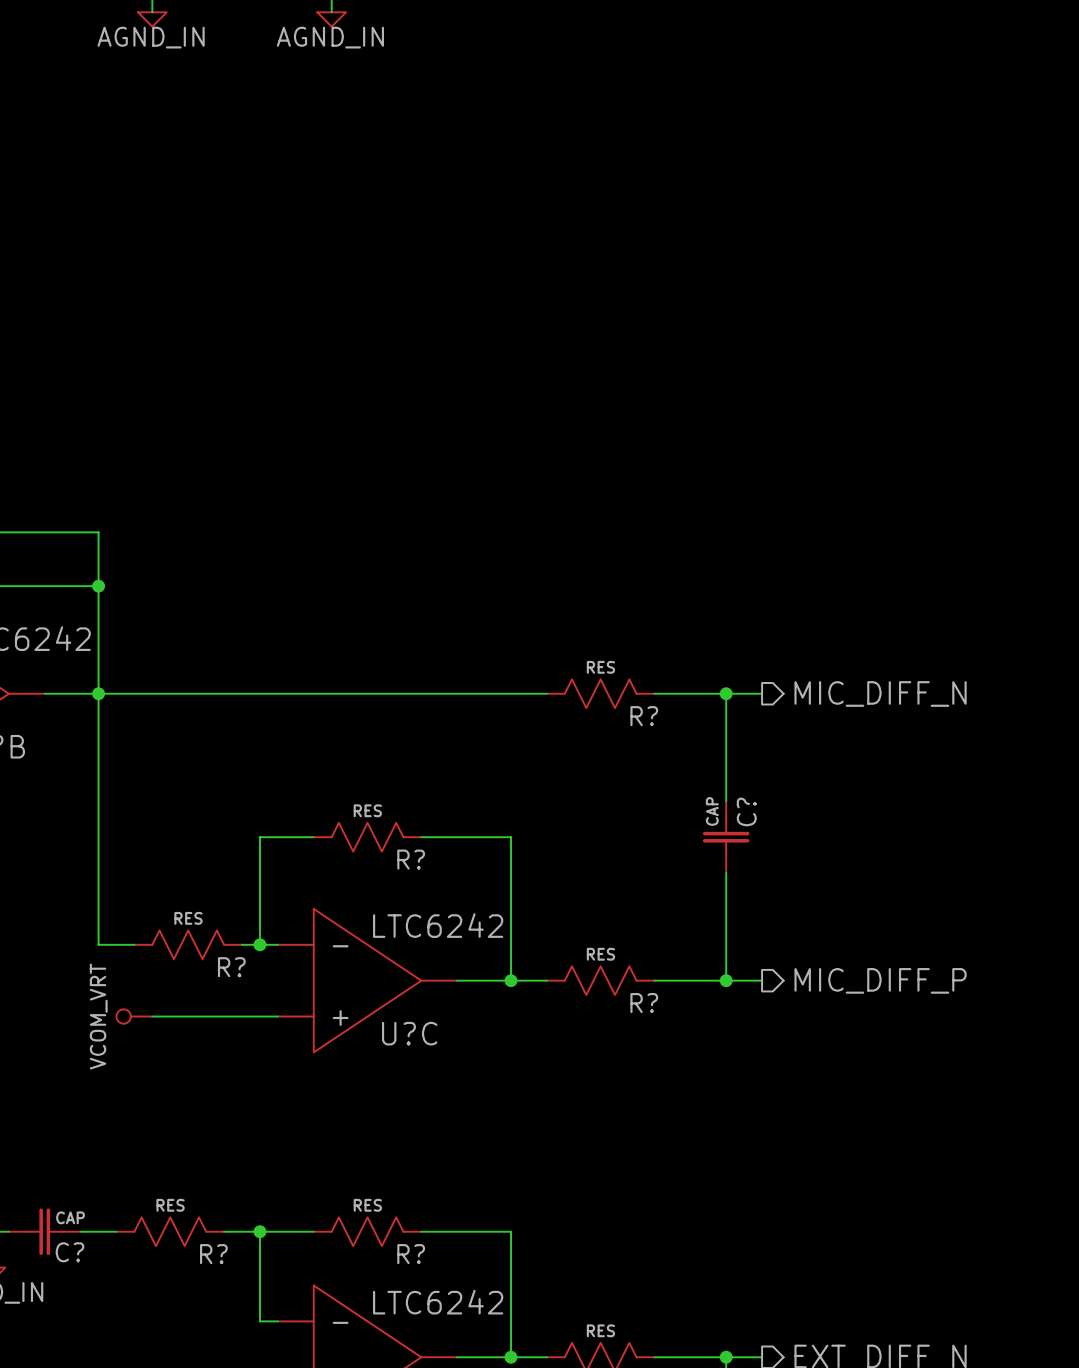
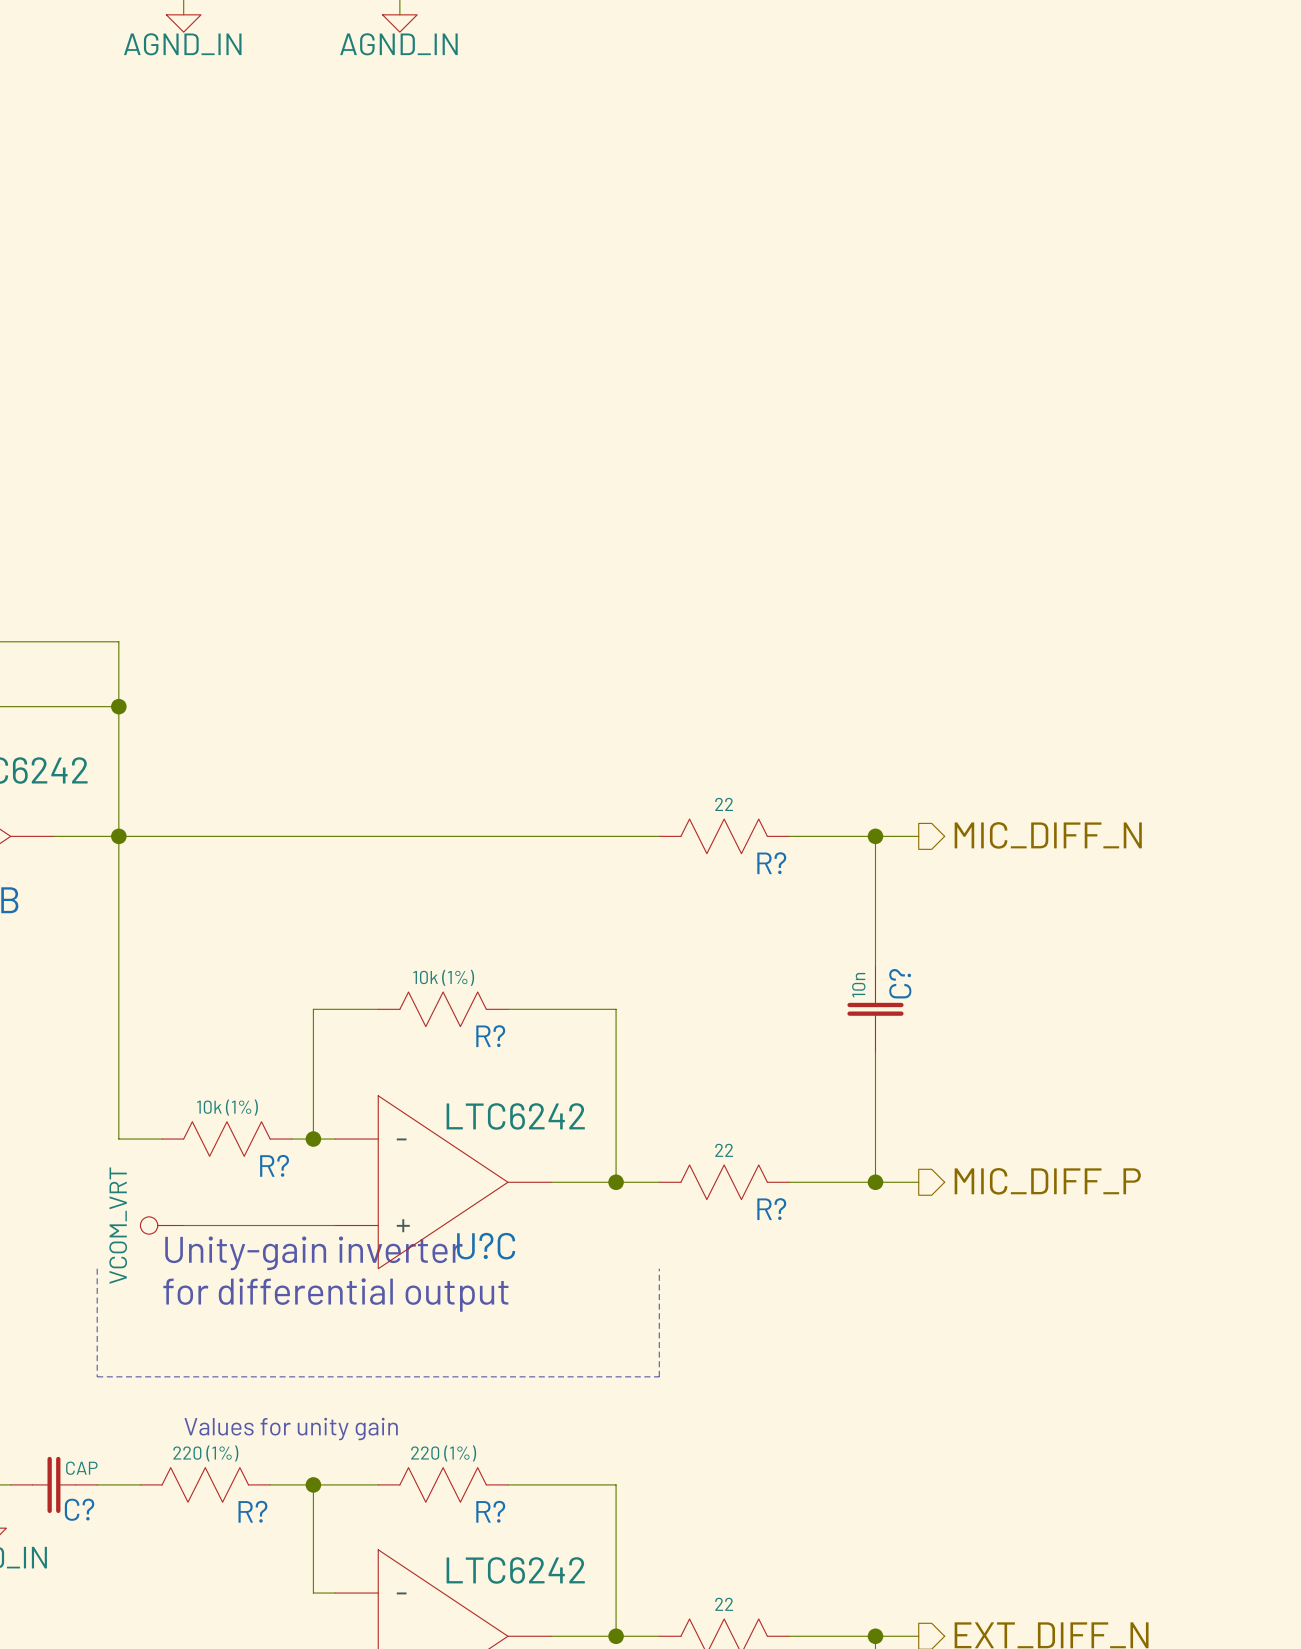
R? value: RES (600, 667) -> 22 (724, 804)
R? value: RES (367, 810) -> 10k (1%) (443, 977)
C? value: CAP (712, 811) -> 10n (858, 985)
R? value: RES (188, 918) -> 10k (1%) (227, 1107)
R? value: RES (600, 954) -> 22 (724, 1150)
text: none -> Unity-gain inverter (314, 1253)
line: none -> (97, 1268) (97, 1376) (659, 1376) (659, 1268)
text: none -> for differential output (335, 1294)
text: none -> Values for unity gain (291, 1429)
R? value: RES (170, 1205) -> 220 (1%) (205, 1453)
R? value: RES (367, 1205) -> 220 (1%) (443, 1453)
part value: RES (600, 1330) -> 22 (724, 1604)

